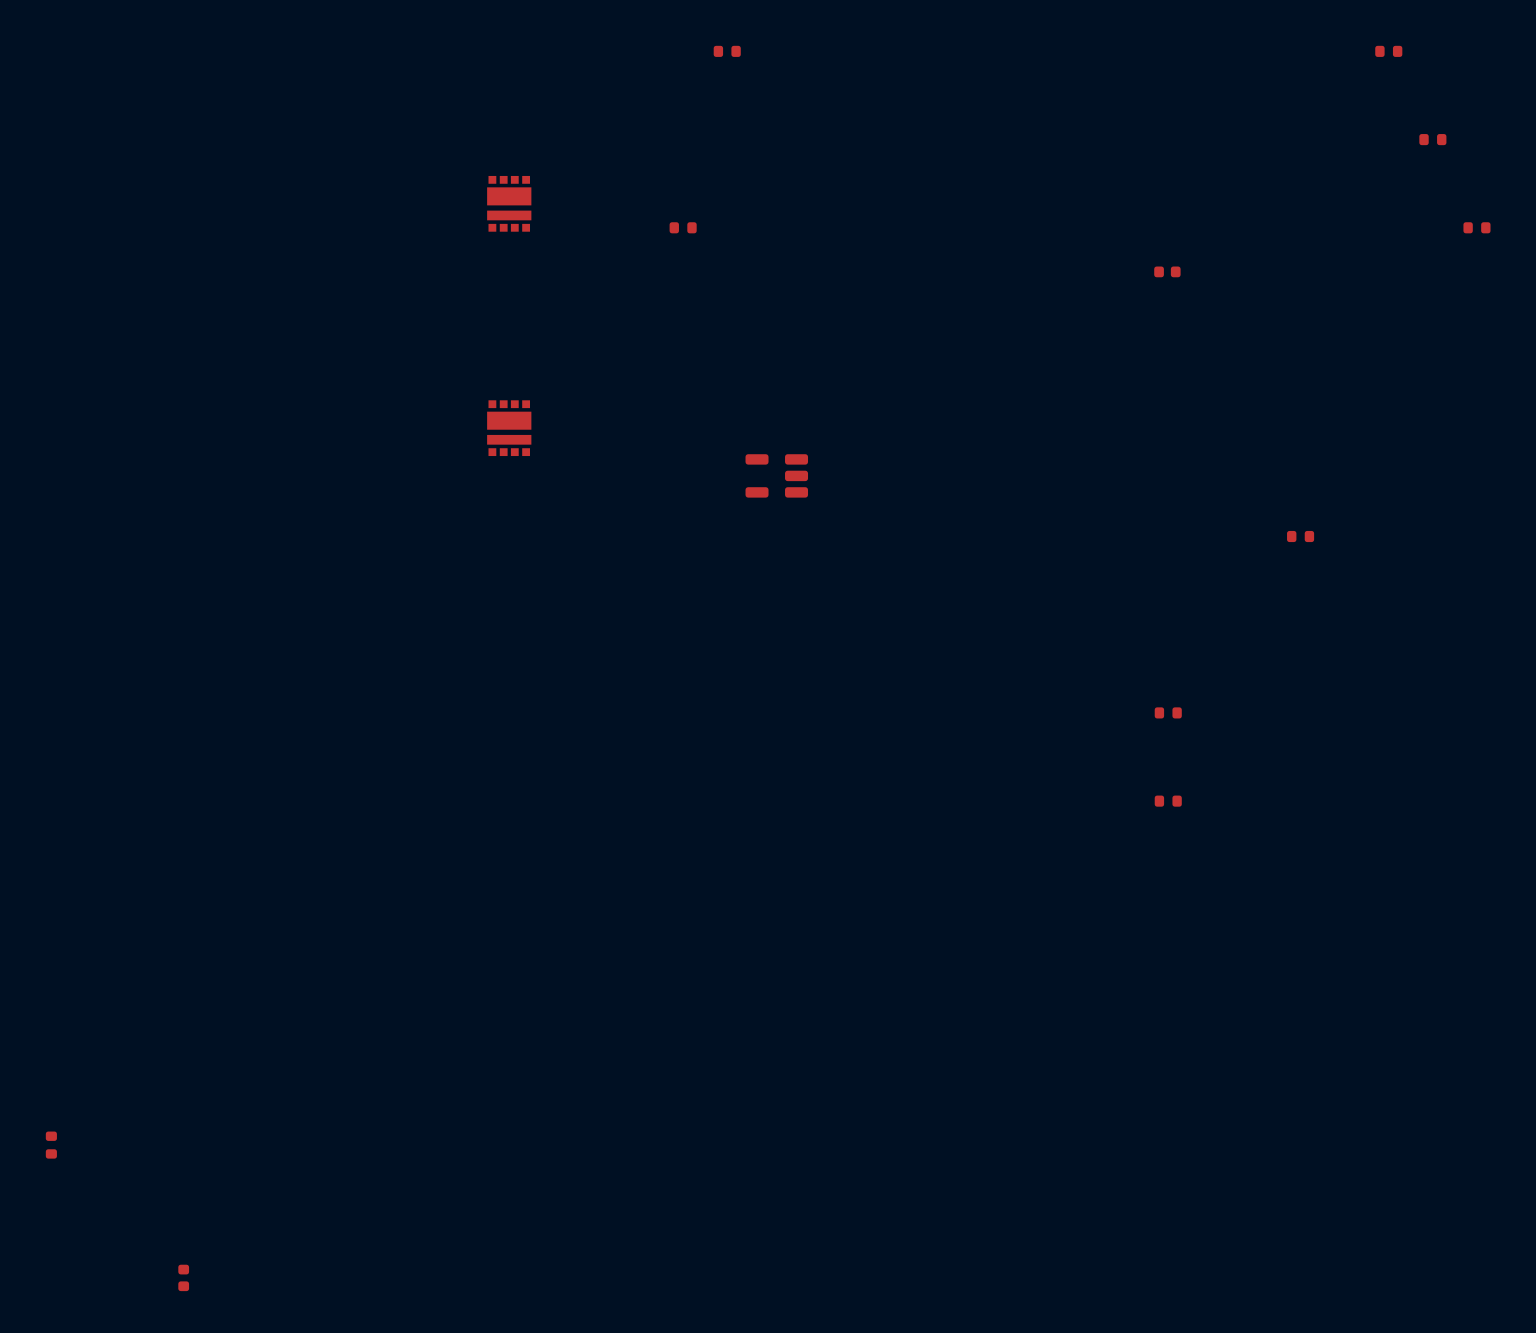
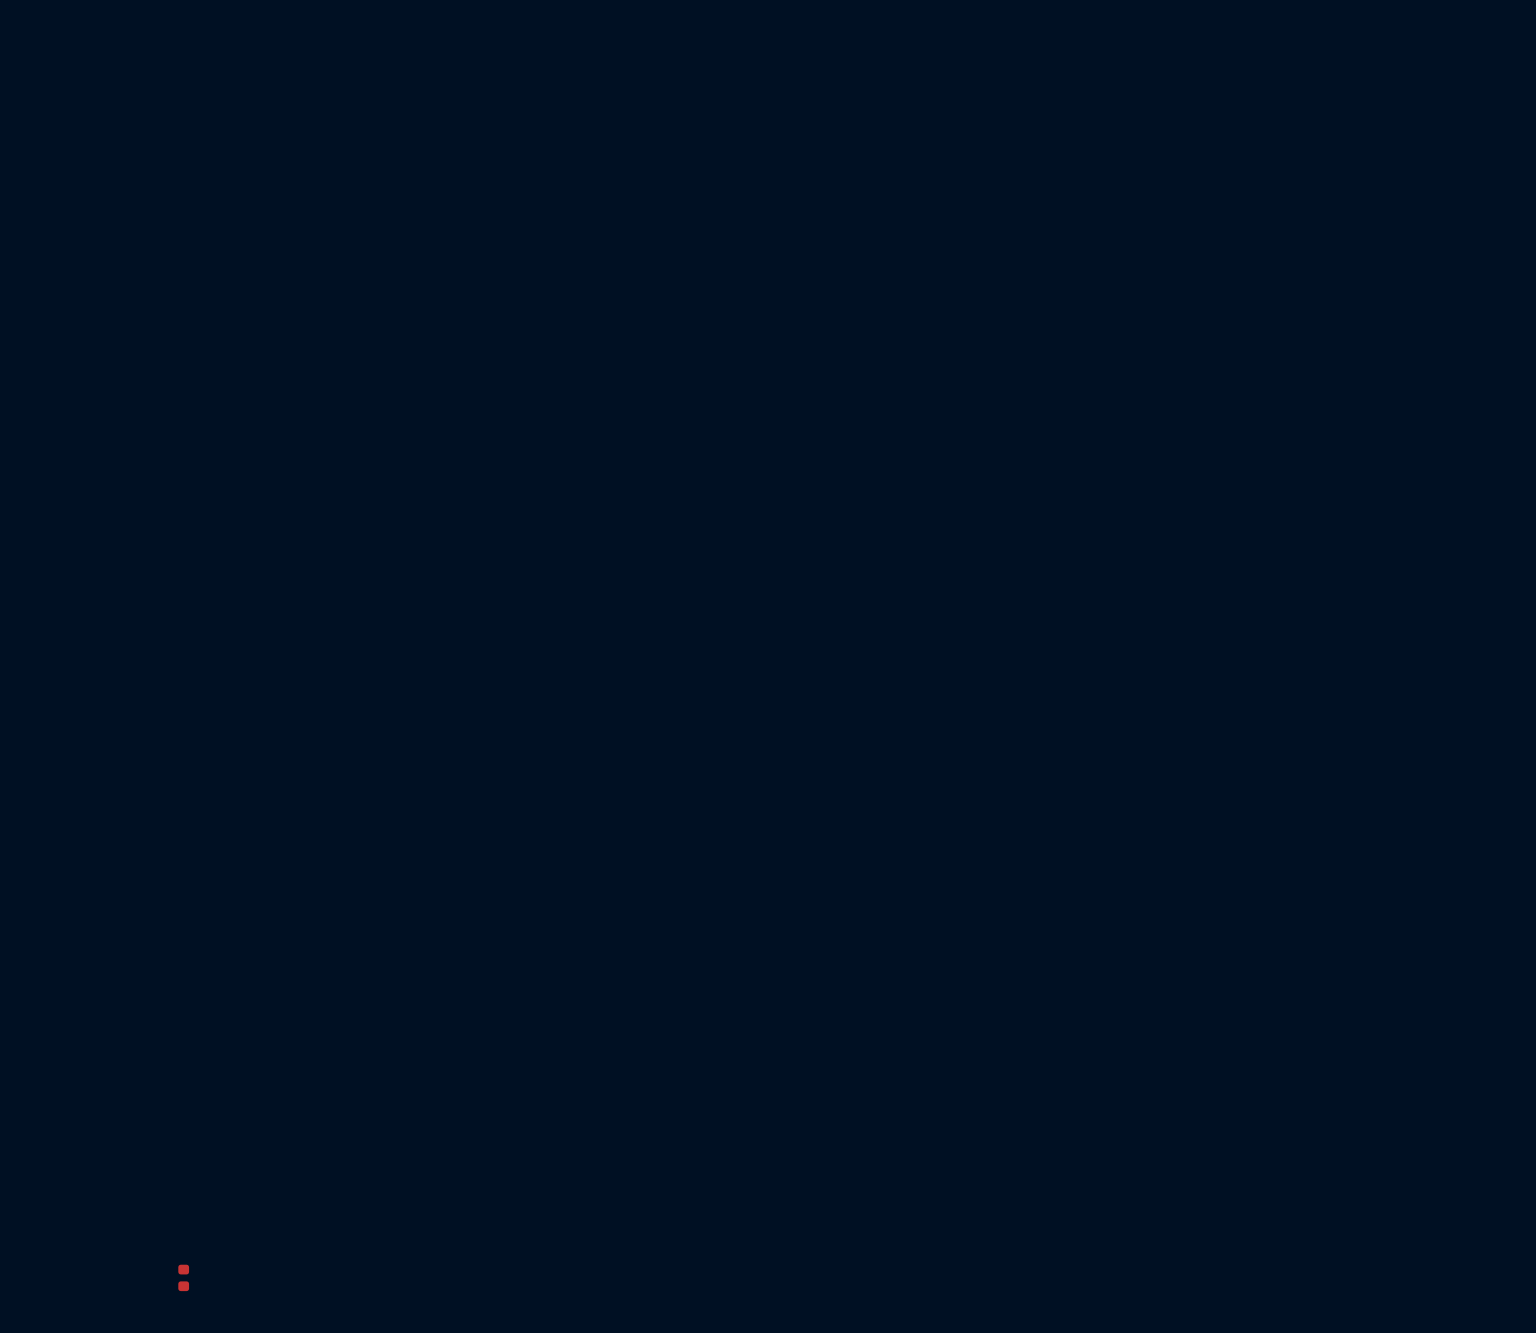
part: (727, 51) -> none
part: (1388, 51) -> none
part: (1432, 139) -> none
part: (509, 203) -> none
part: (683, 227) -> none
part: (1476, 227) -> none
part: (1167, 271) -> none
part: (509, 428) -> none
part: (776, 475) -> none
part: (1300, 536) -> none
part: (1168, 712) -> none
part: (1168, 801) -> none
part: (51, 1145) -> none

